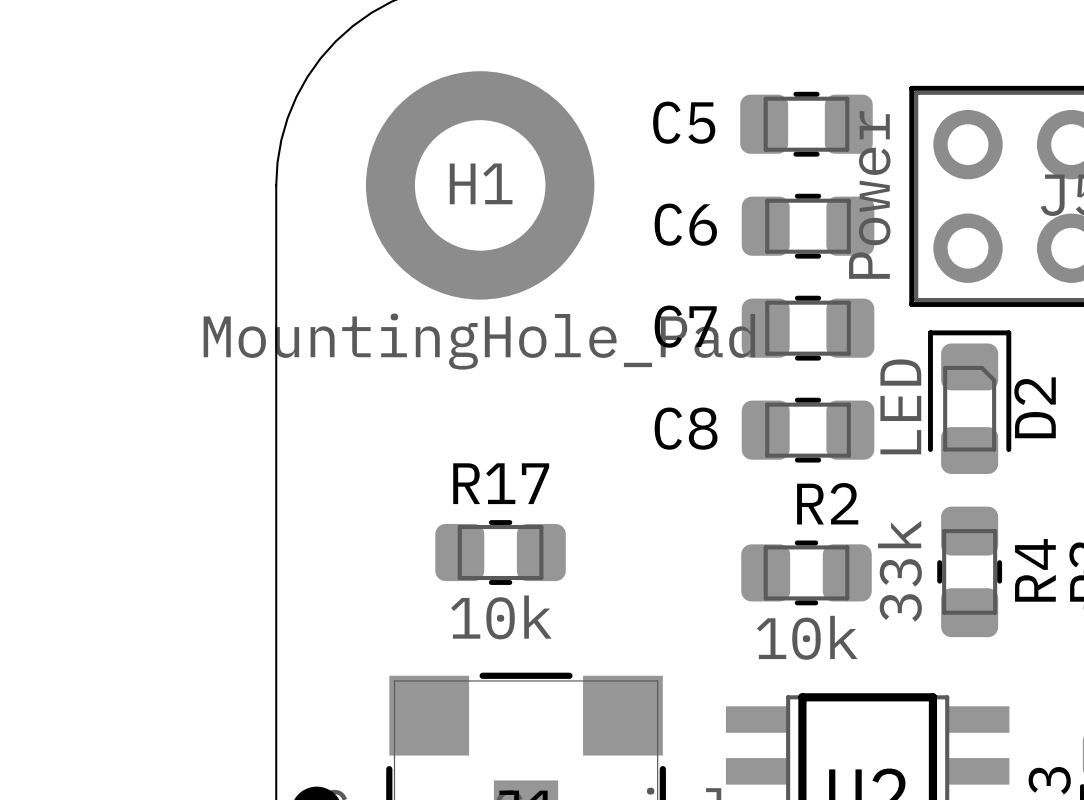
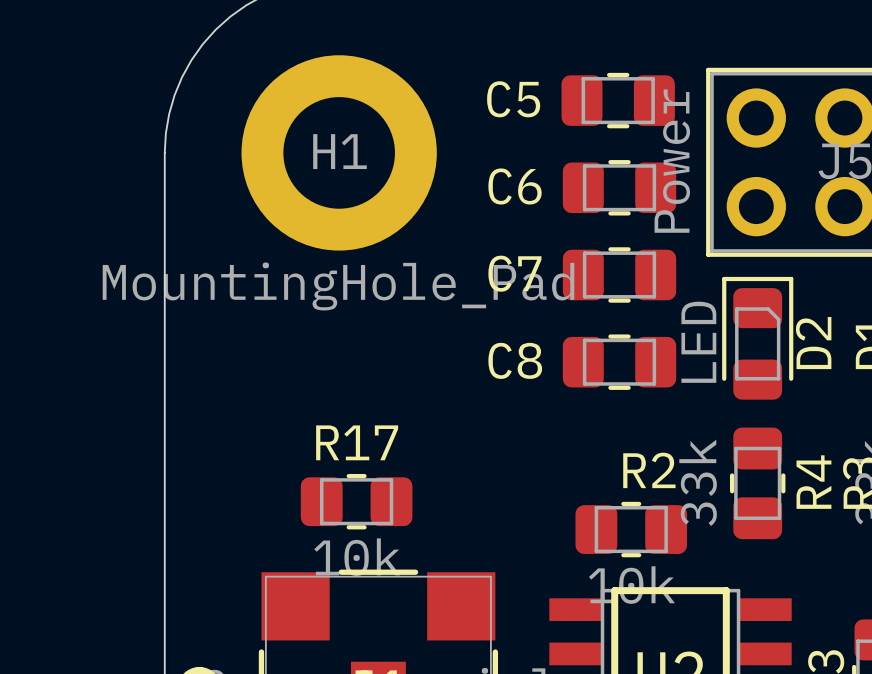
R17 position: (500, 552) -> (356, 501)
R2 position: (806, 572) -> (631, 529)

